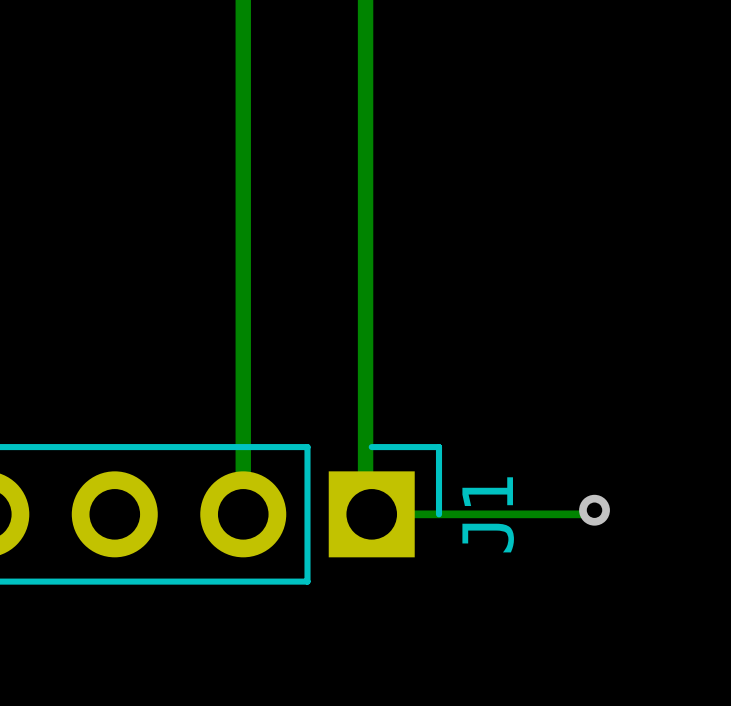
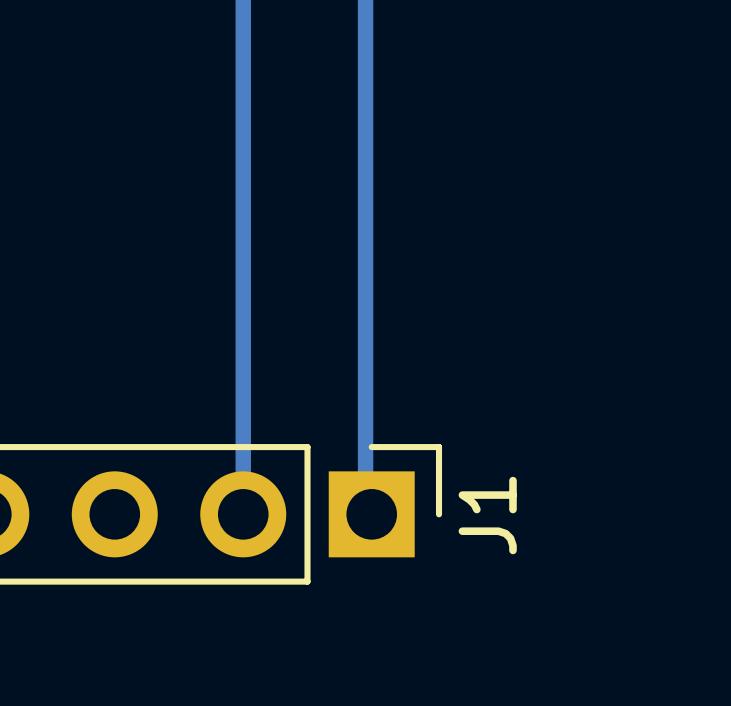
bottom track: (594, 510) (590, 514) (371, 514) -> none
via: (594, 510) -> none

